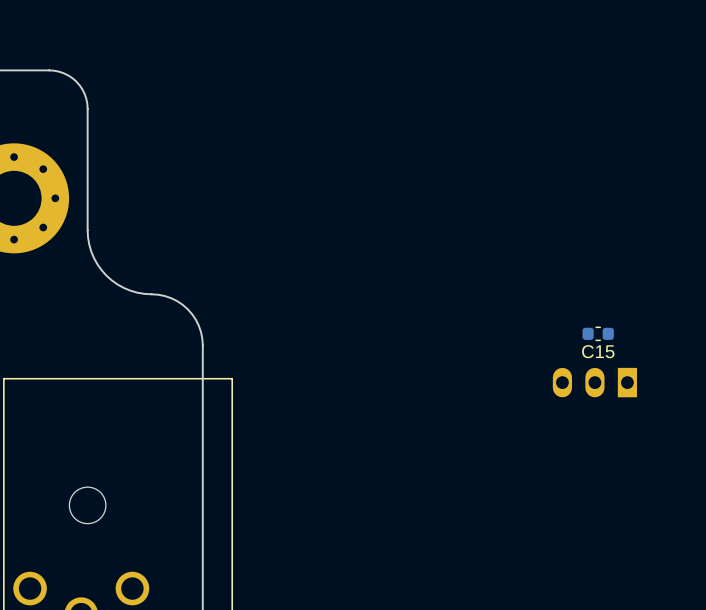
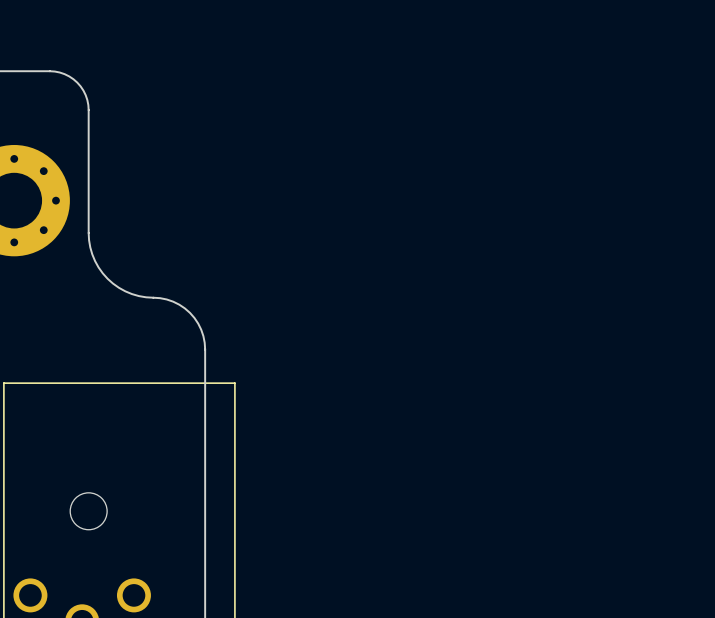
C15: (598, 333) -> none
part: (594, 382) -> none

